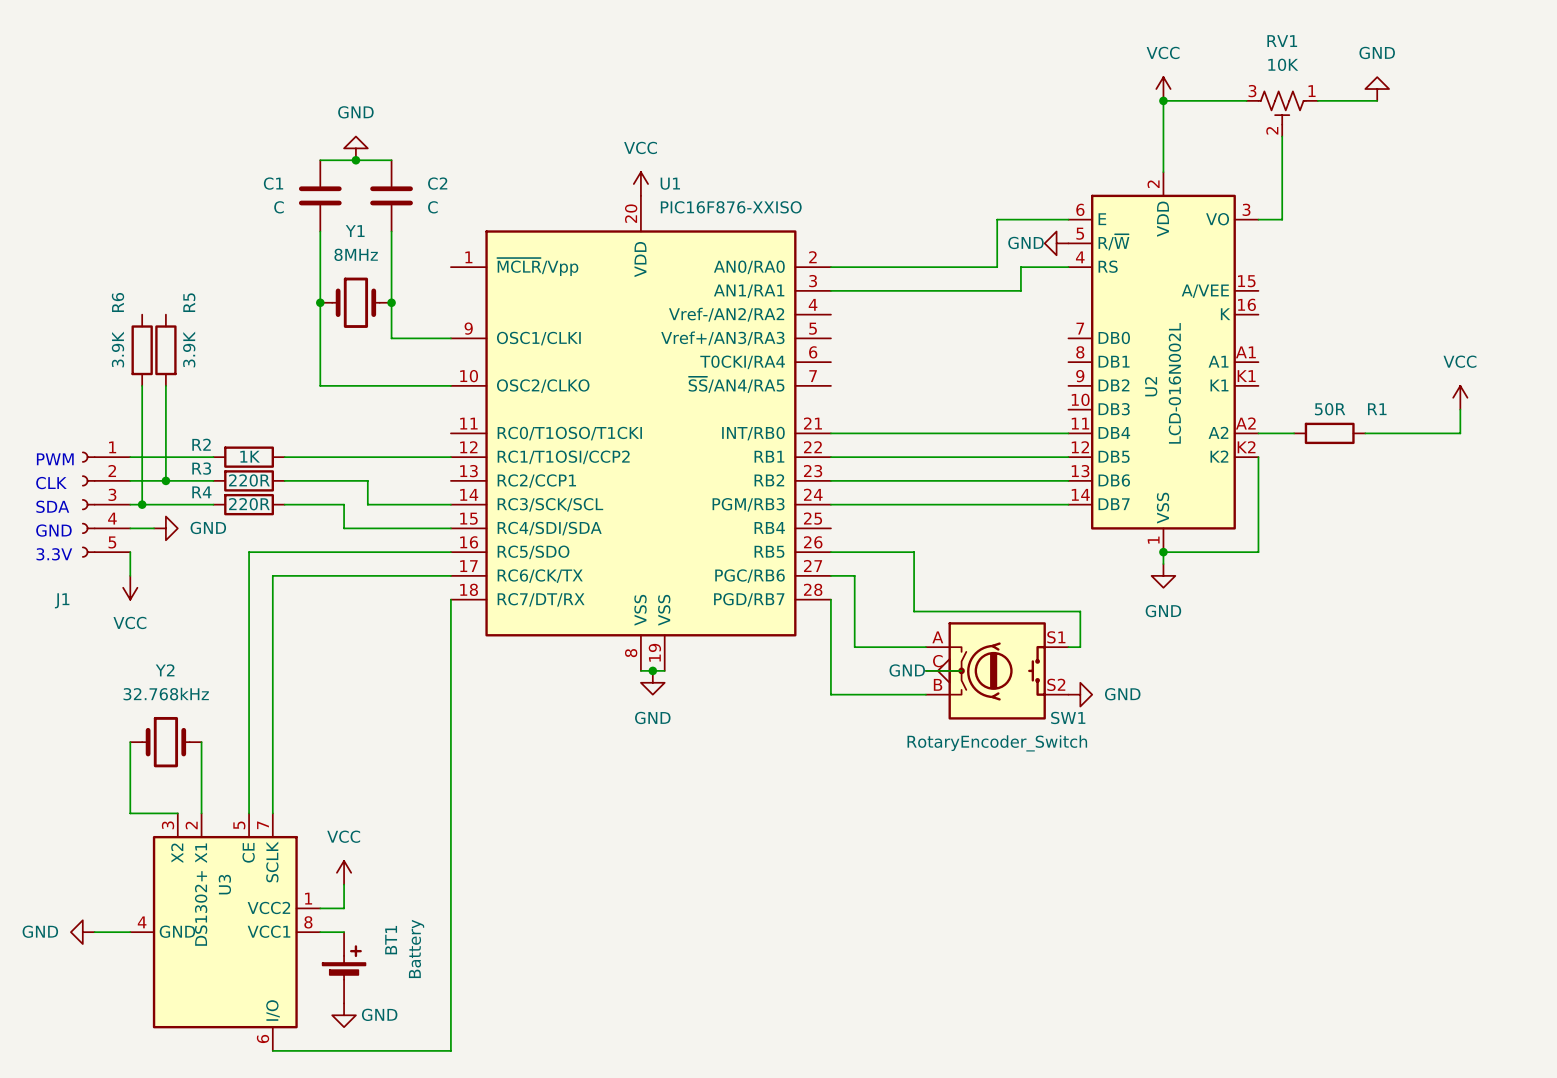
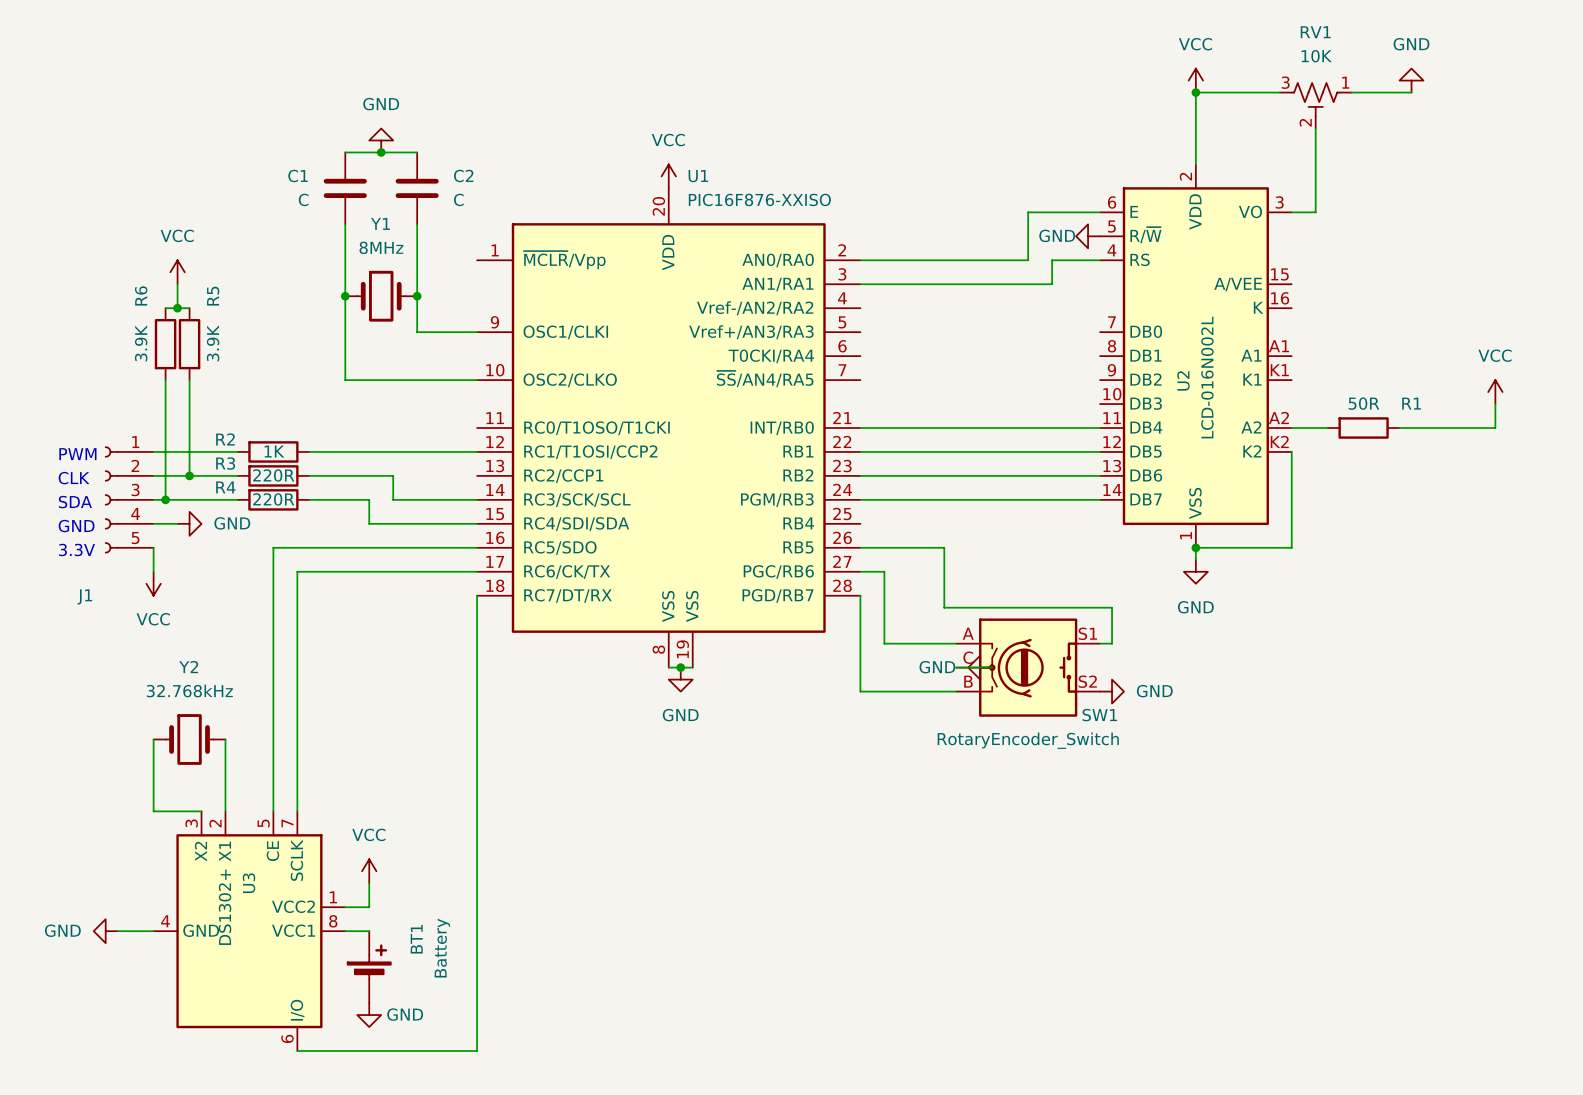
power symbol: none -> VCC (177, 272)
wire: none -> (177, 284) (177, 308)
wire: none -> (165, 308) (189, 308)
junction: none -> (177, 308)

